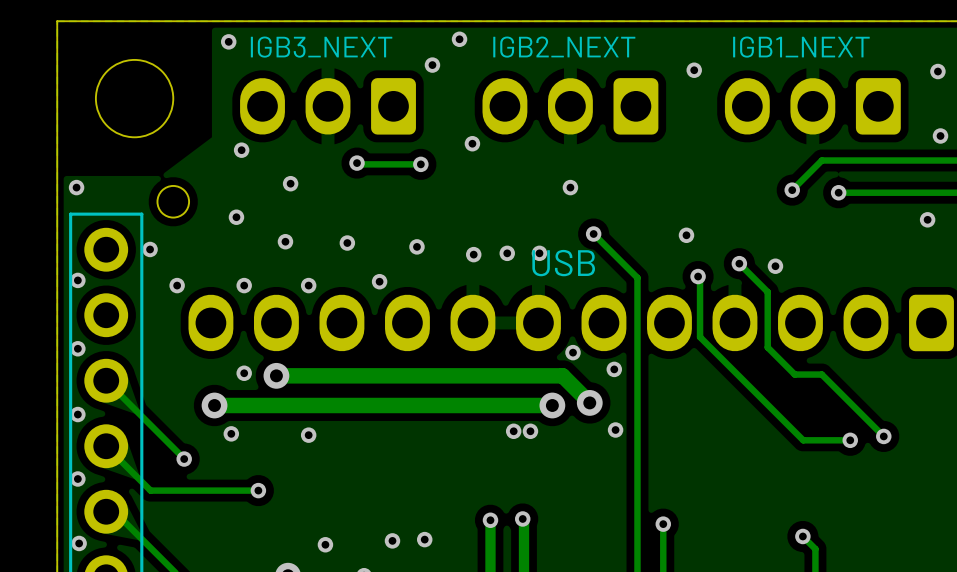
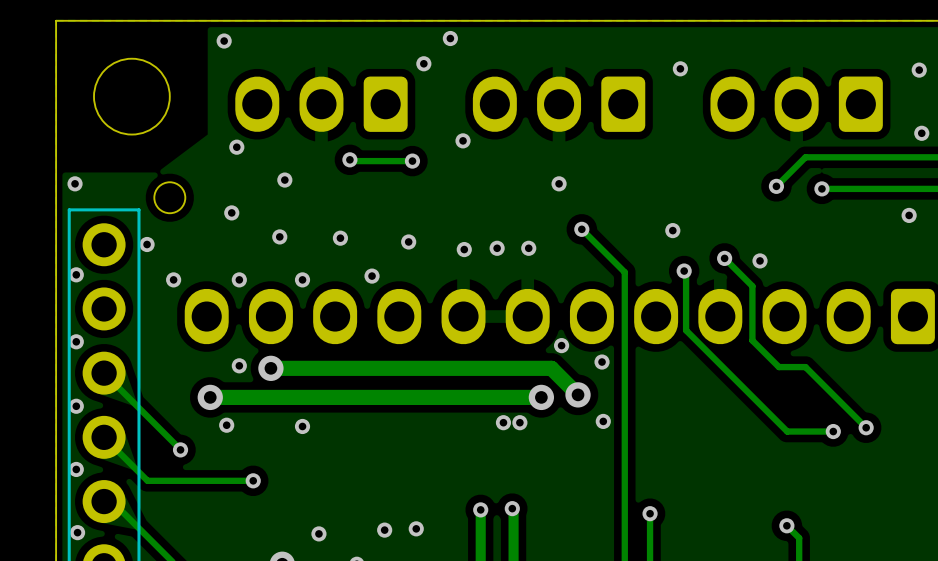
text: IGB3_NEXT (321, 47) -> none
text: IGB2_NEXT (564, 47) -> none
text: IGB1_NEXT (801, 47) -> none
text: USB (563, 263) -> none

